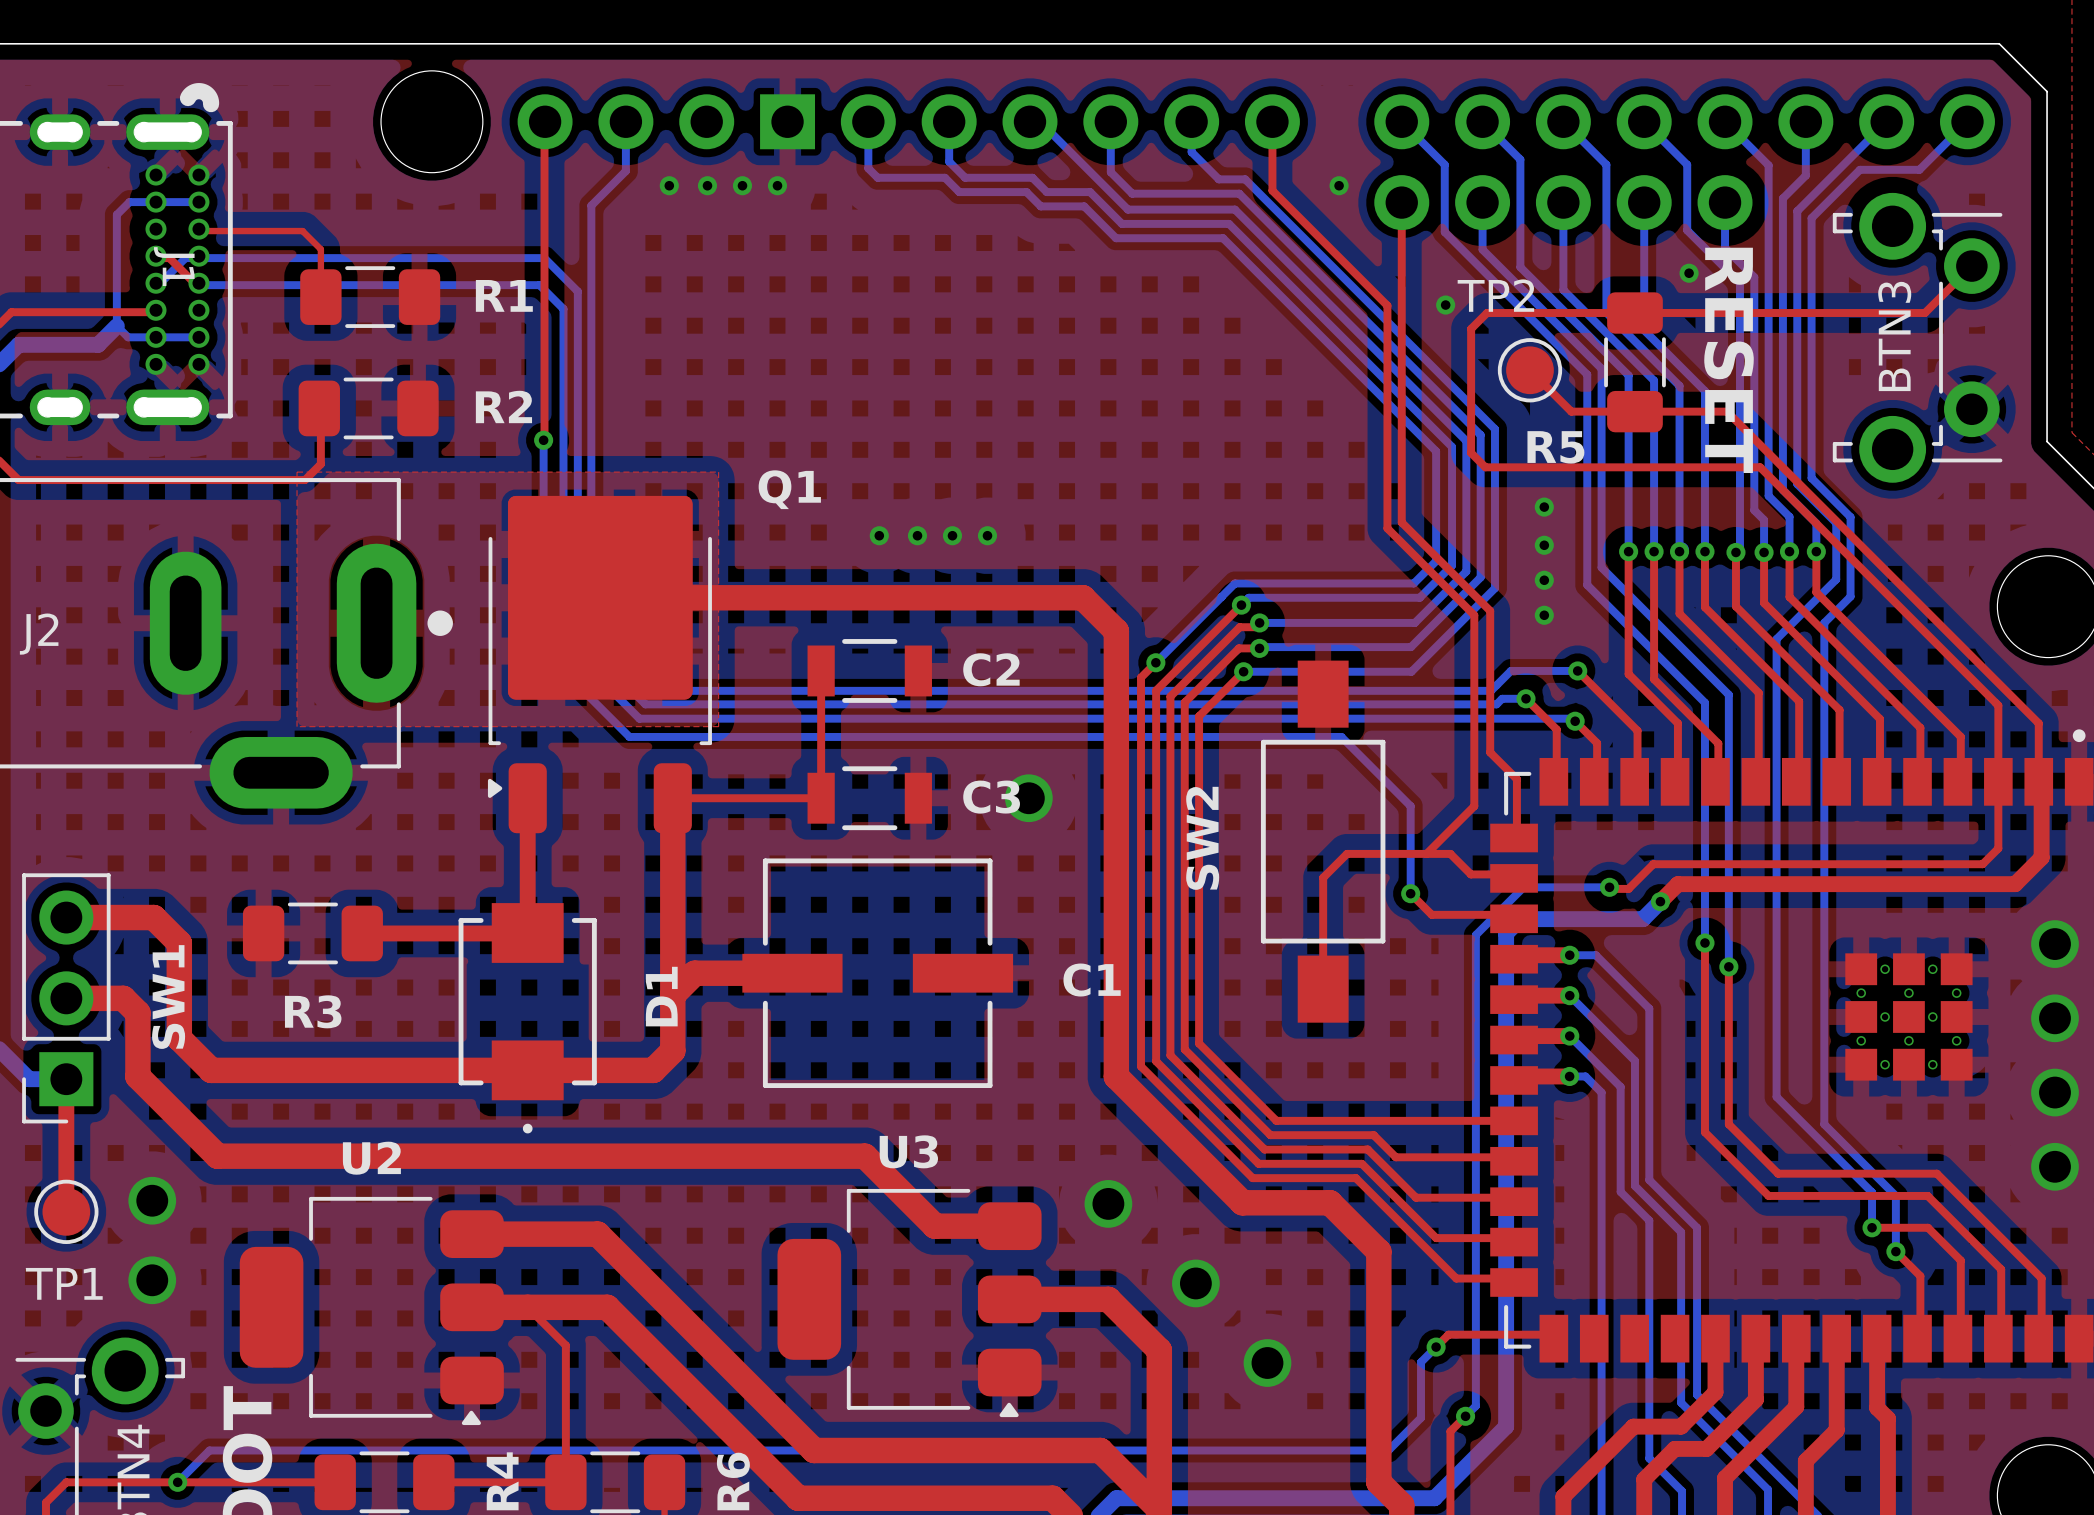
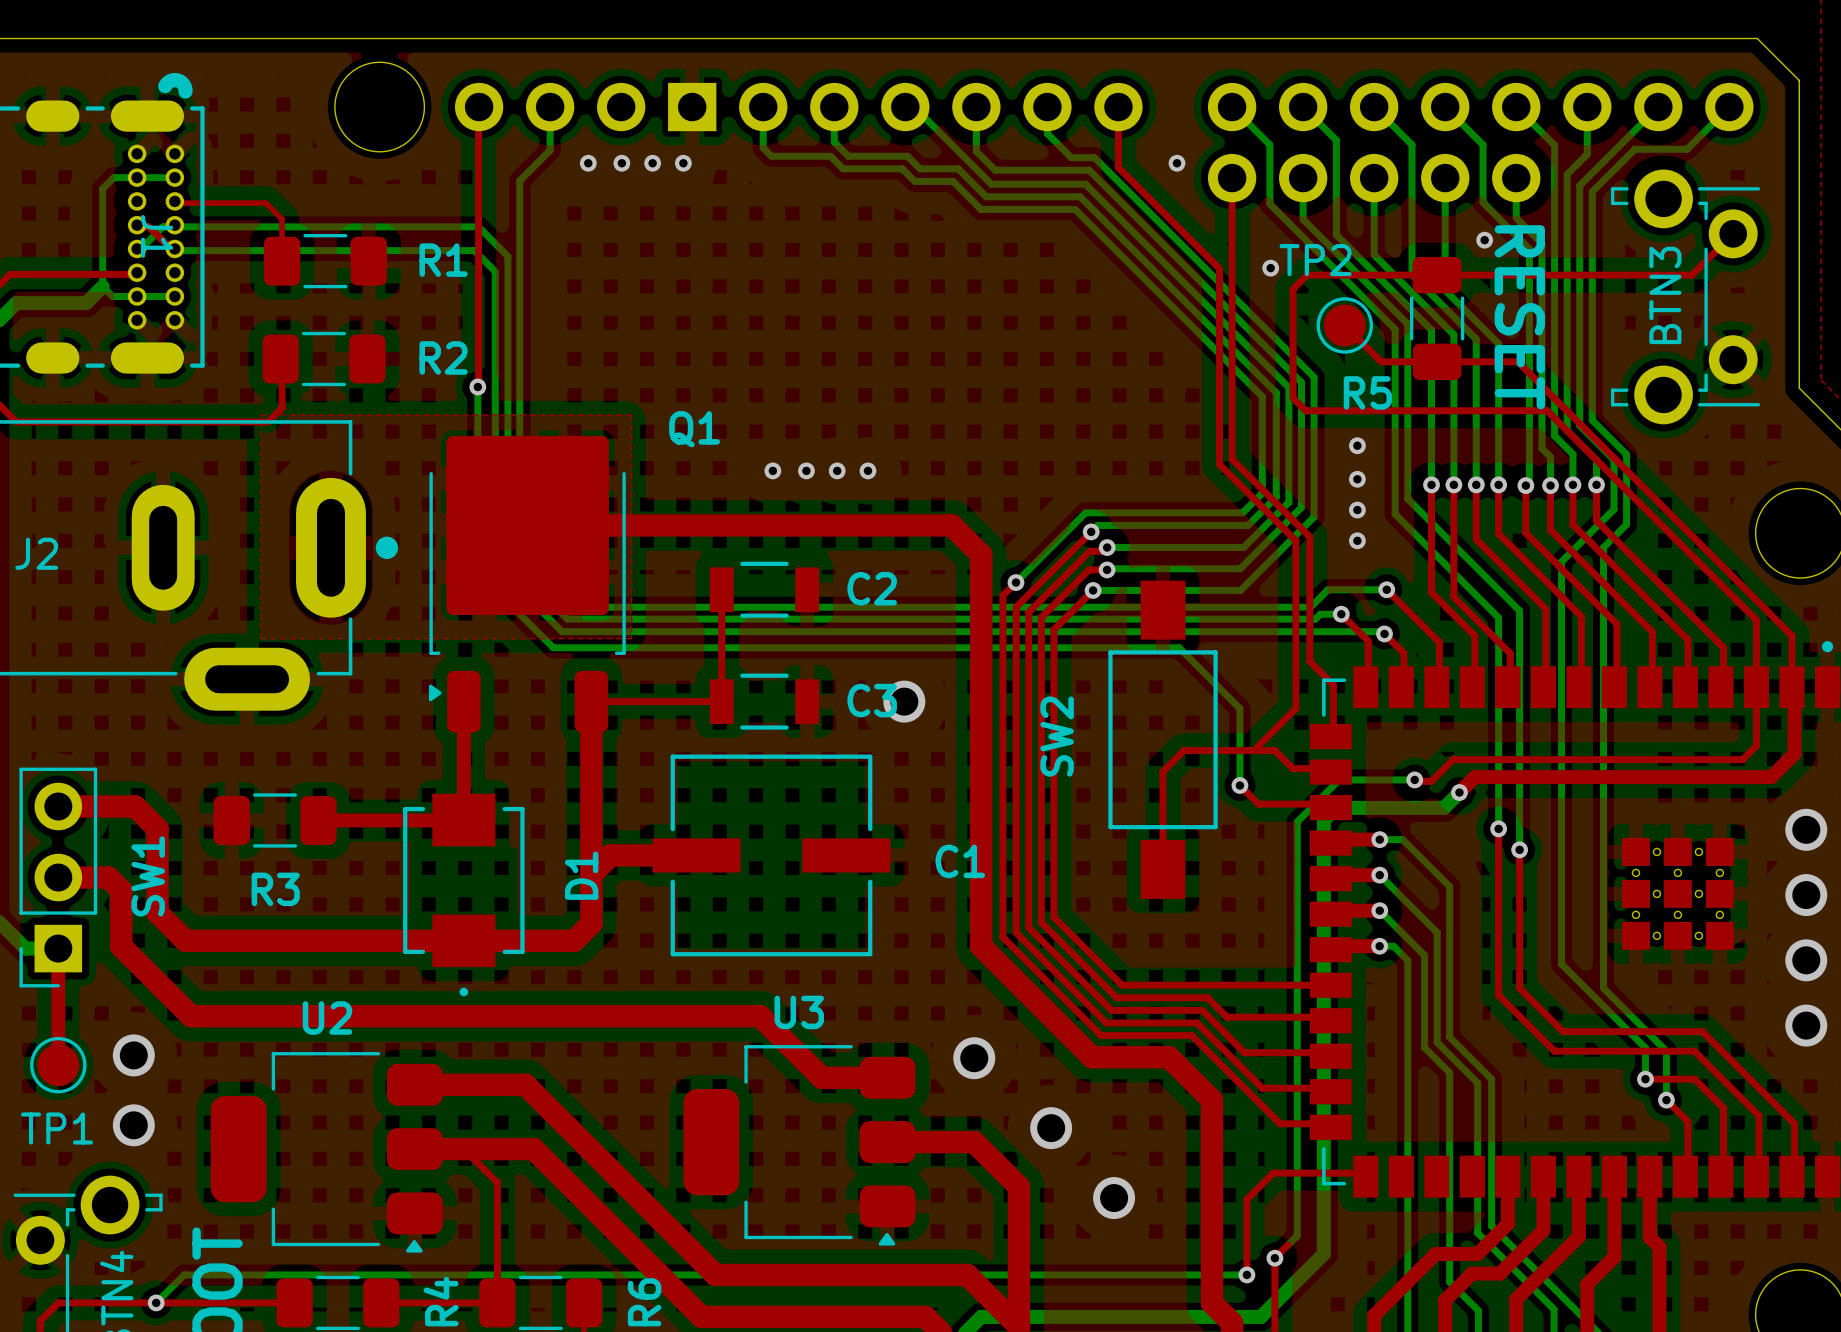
top track: none -> (1262, 1184) (1246, 1199) (1246, 1274)
bottom track: (1436, 1347) (1421, 1362) (1421, 1417) (1388, 1450) -> (1246, 1274) (1220, 1274)
via: (1436, 1347) -> none
via position: (1465, 1416) -> (1274, 1258)
via: none -> (1246, 1274)

